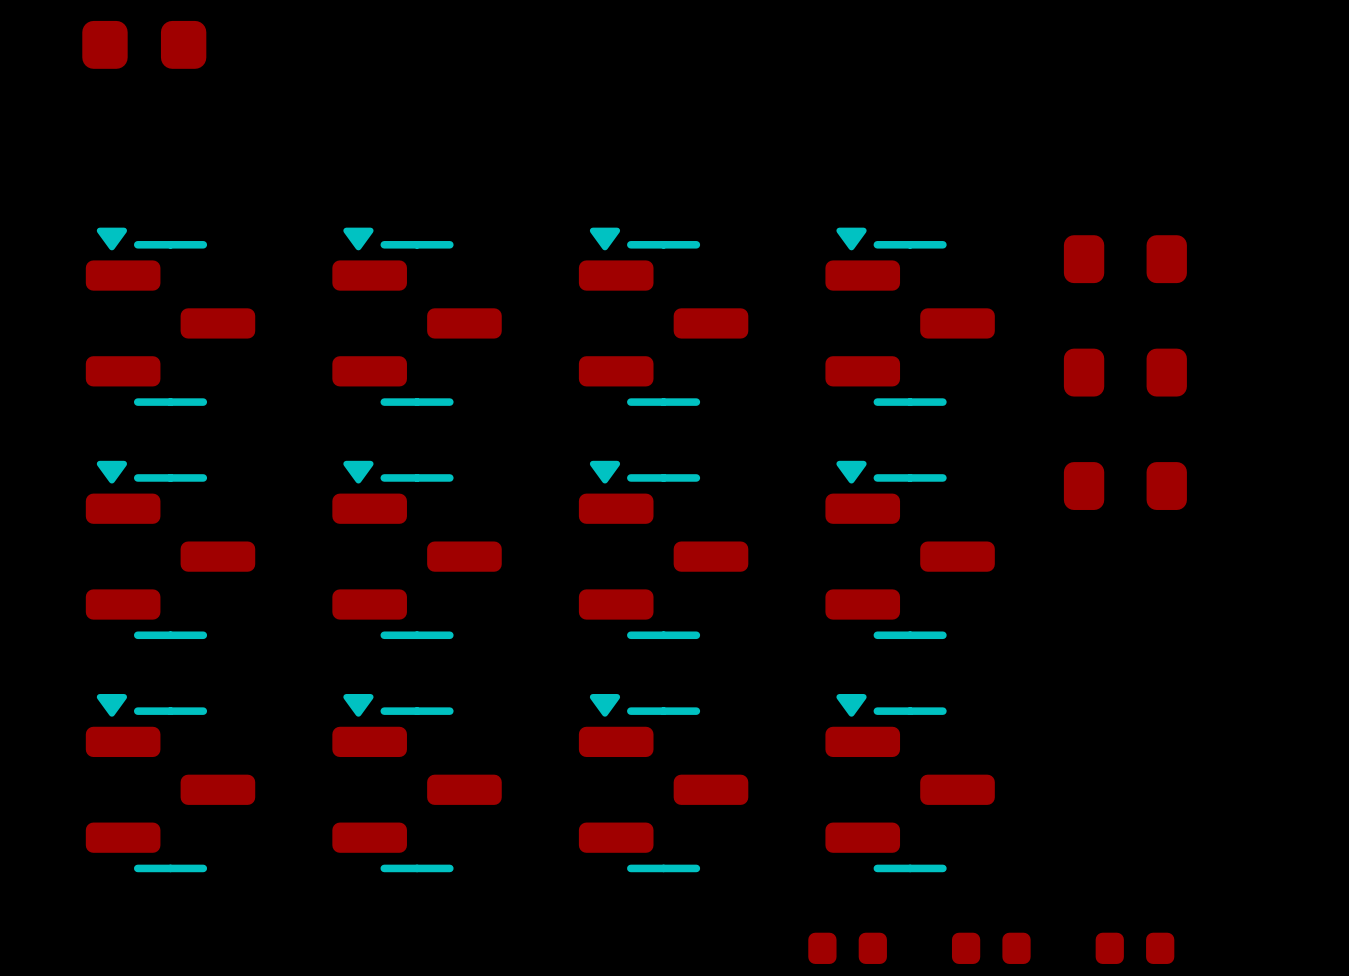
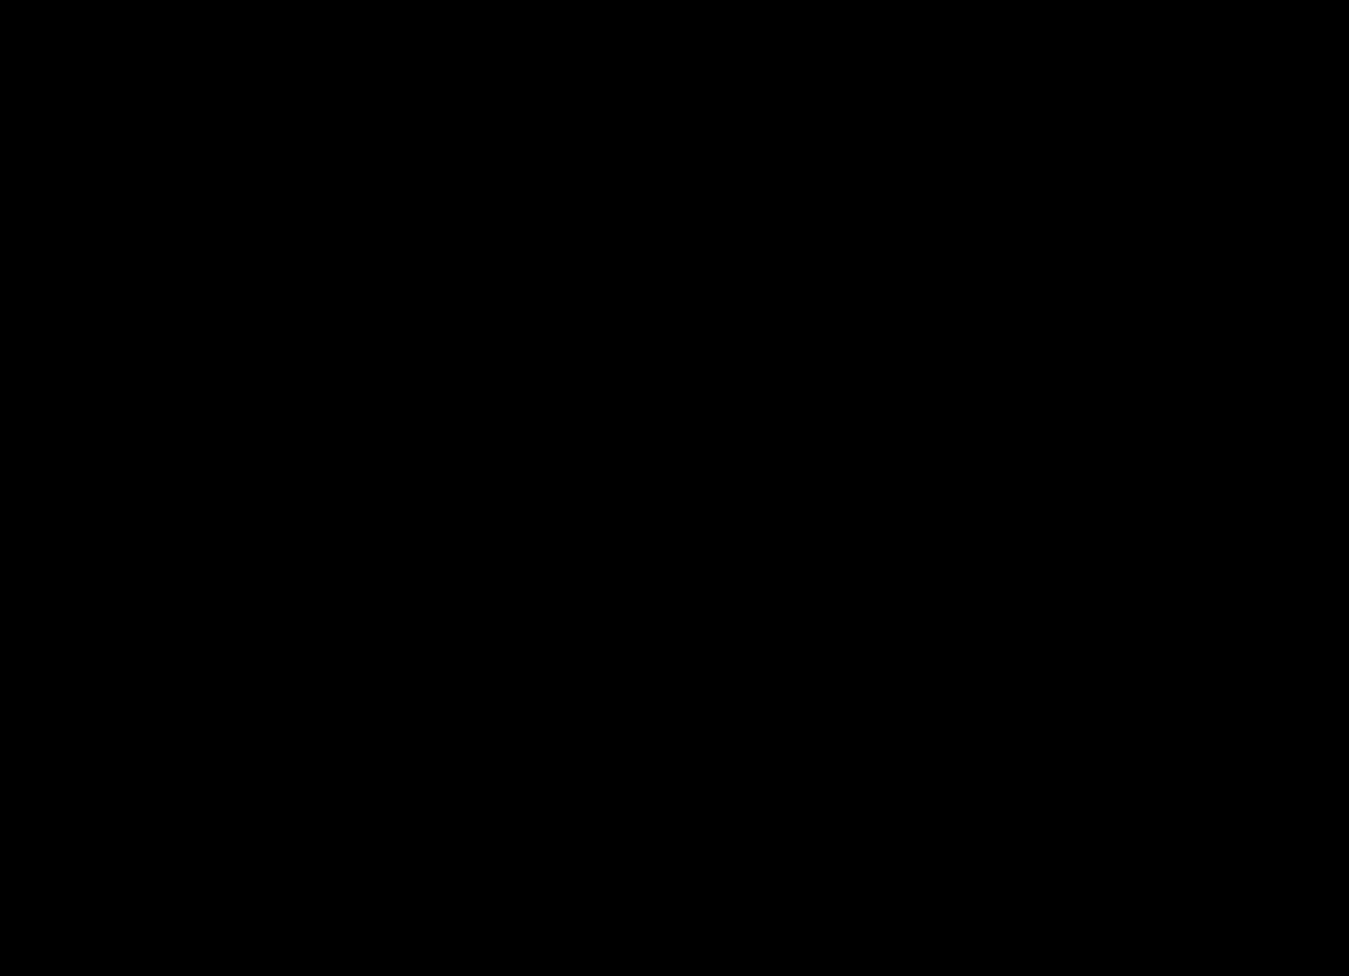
part: (144, 44) -> none
part: (1125, 259) -> none
part: (170, 316) -> none
part: (417, 316) -> none
part: (663, 316) -> none
part: (910, 316) -> none
part: (1125, 372) -> none
part: (1125, 486) -> none
part: (170, 549) -> none
part: (417, 549) -> none
part: (663, 549) -> none
part: (910, 549) -> none
part: (170, 783) -> none
part: (417, 783) -> none
part: (663, 783) -> none
part: (910, 783) -> none
part: (847, 948) -> none
part: (991, 948) -> none
part: (1134, 948) -> none

